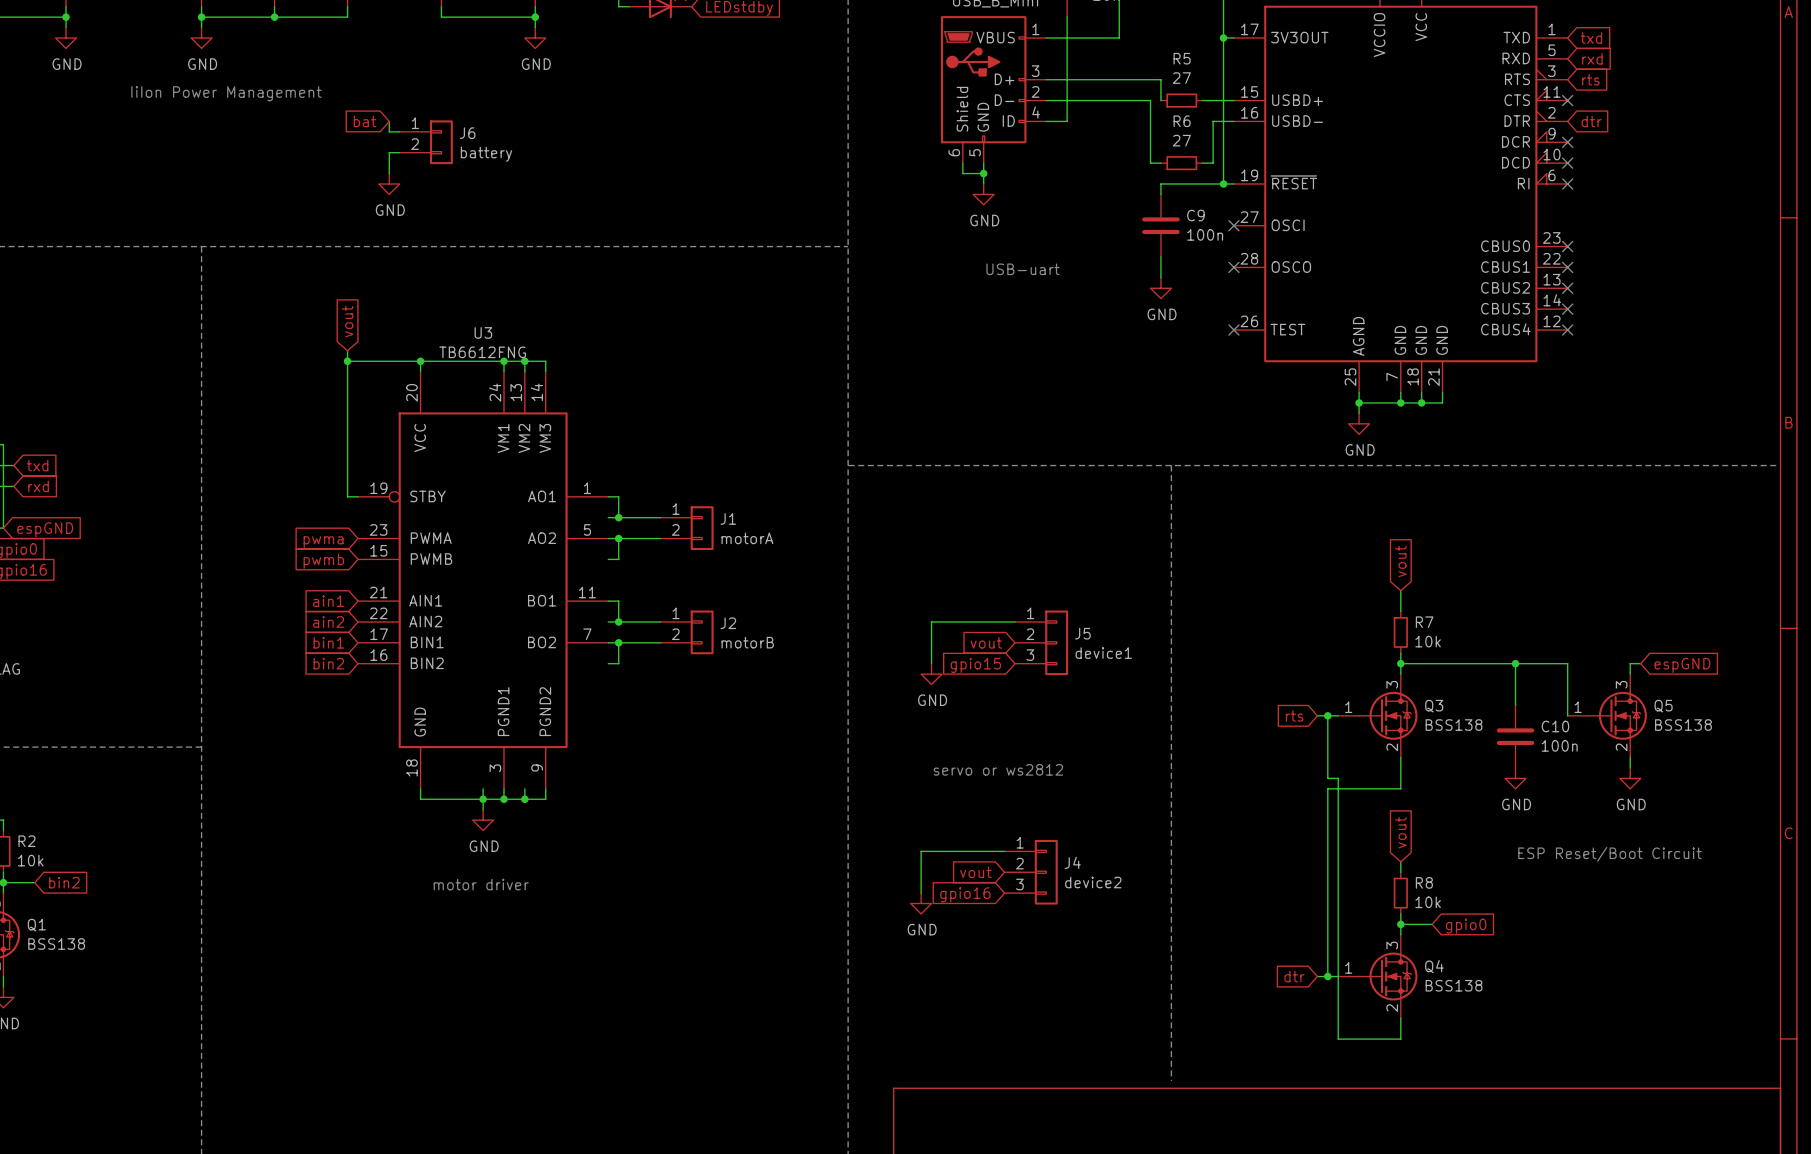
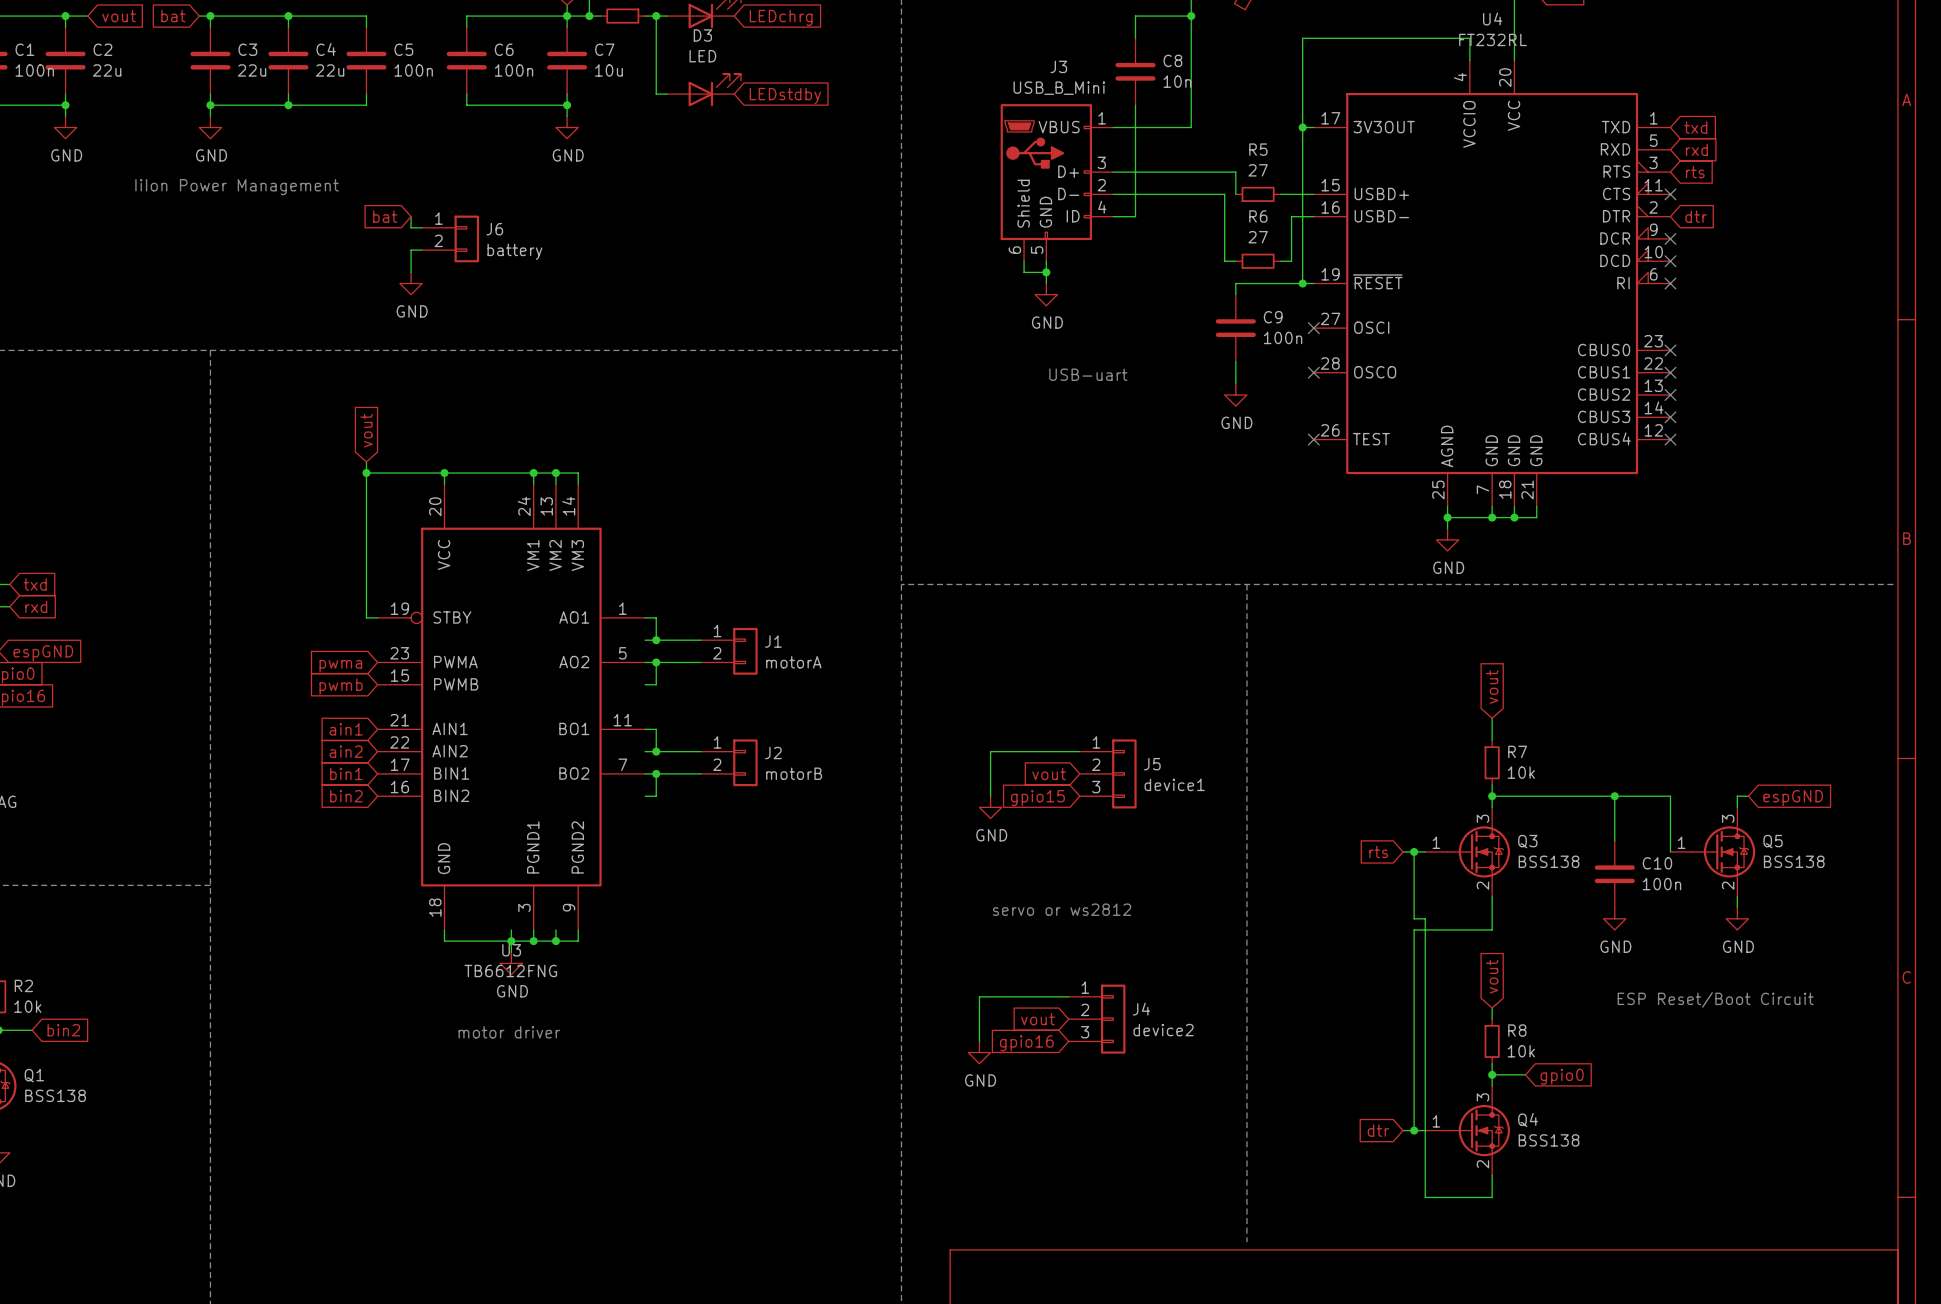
U3 name position: U3 (483, 332) -> U3 (511, 950)
U3 value position: TB6612FNG (482, 352) -> TB6612FNG (510, 971)

